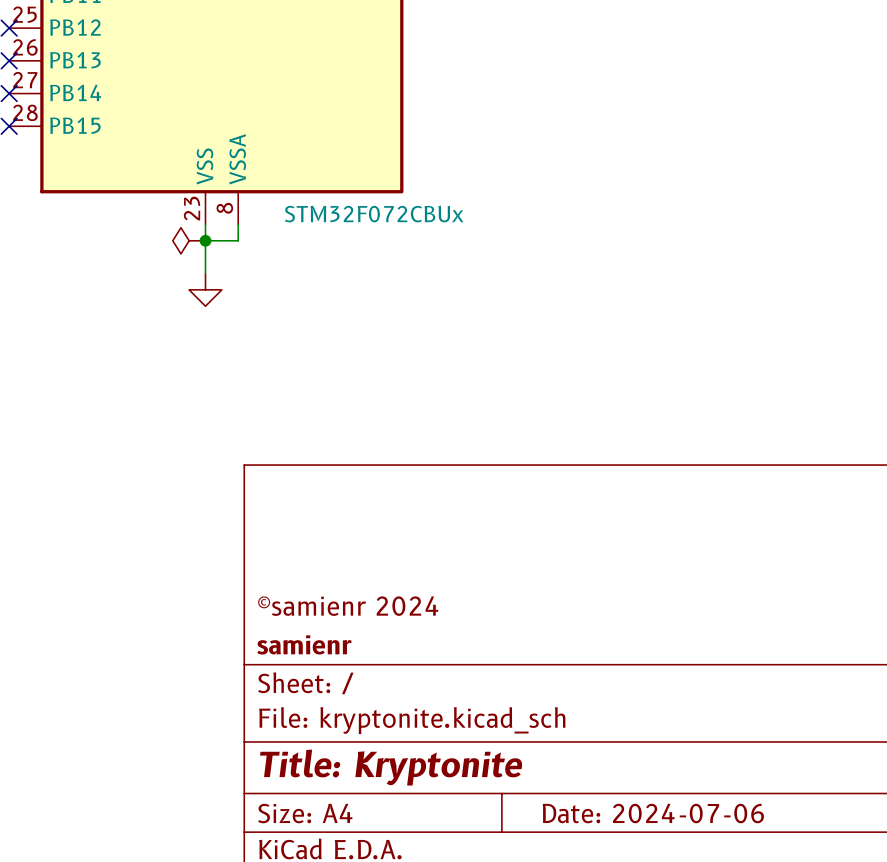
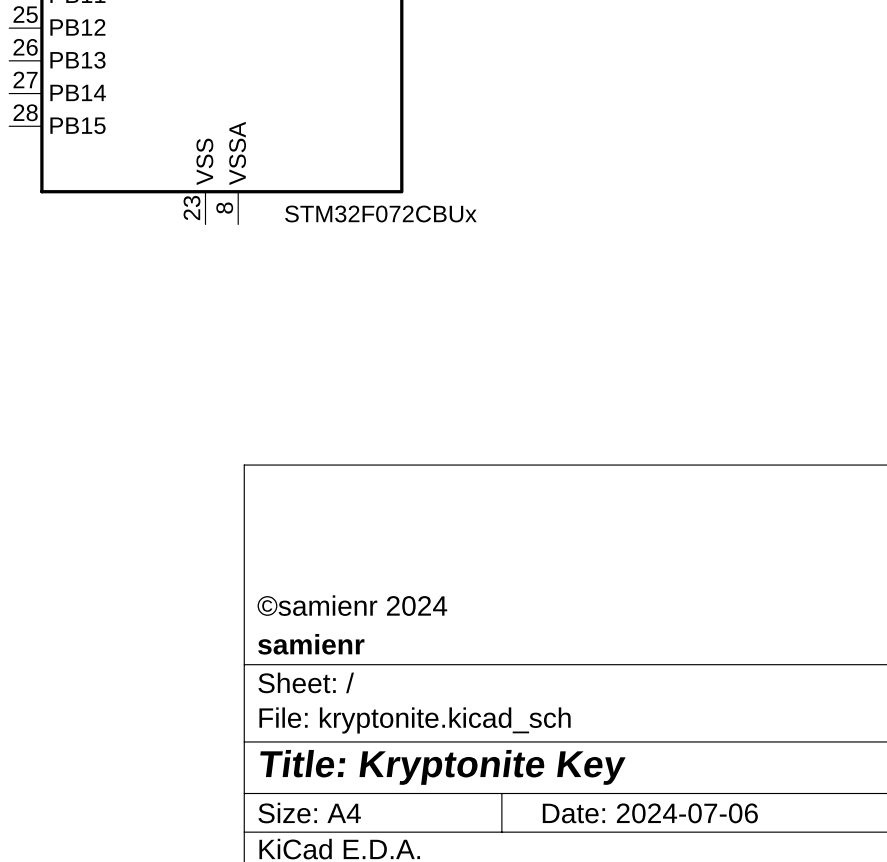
no-connect mark: (9, 28) -> none
no-connect mark: (9, 60) -> none
no-connect mark: (9, 93) -> none
no-connect mark: (9, 126) -> none
wire: (205, 224) (205, 273) -> none
wire: (238, 224) (238, 240) (205, 240) -> none
power symbol: (189, 240) -> none
junction: (205, 240) -> none
power symbol: (205, 289) -> none
title block: Title: Kryptonite (391, 767) -> Title: Kryptonite Key (442, 767)

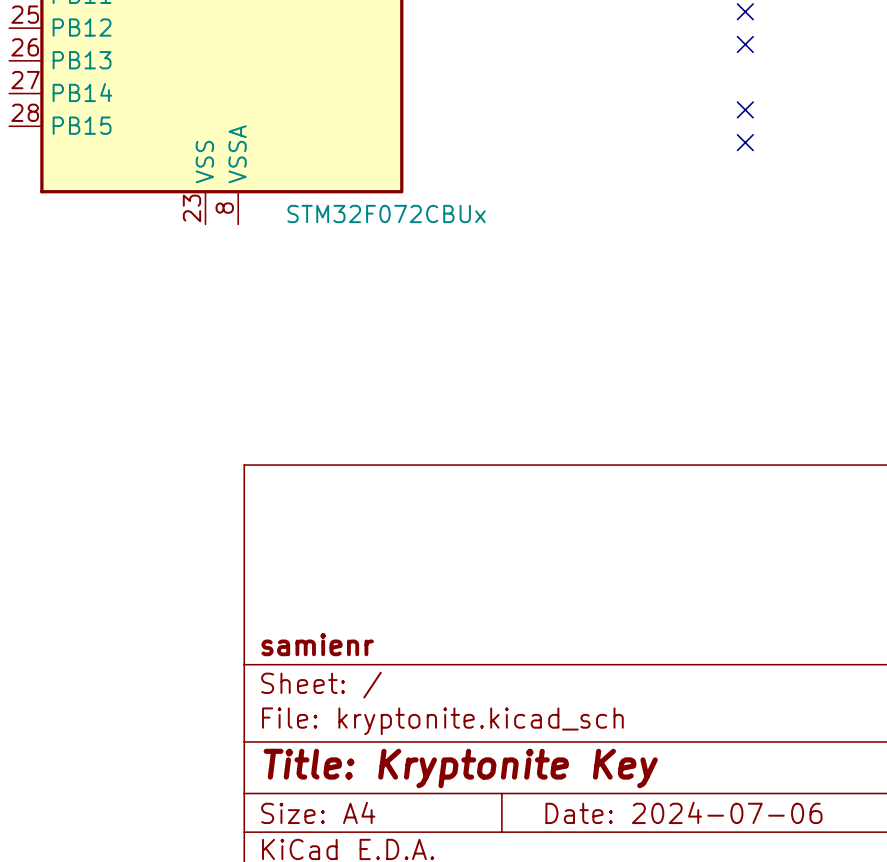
no-connect mark: none -> (745, 11)
no-connect mark: none -> (745, 44)
no-connect mark: none -> (745, 109)
no-connect mark: none -> (745, 142)
title block: ©samienr 2024 (352, 605) -> none

